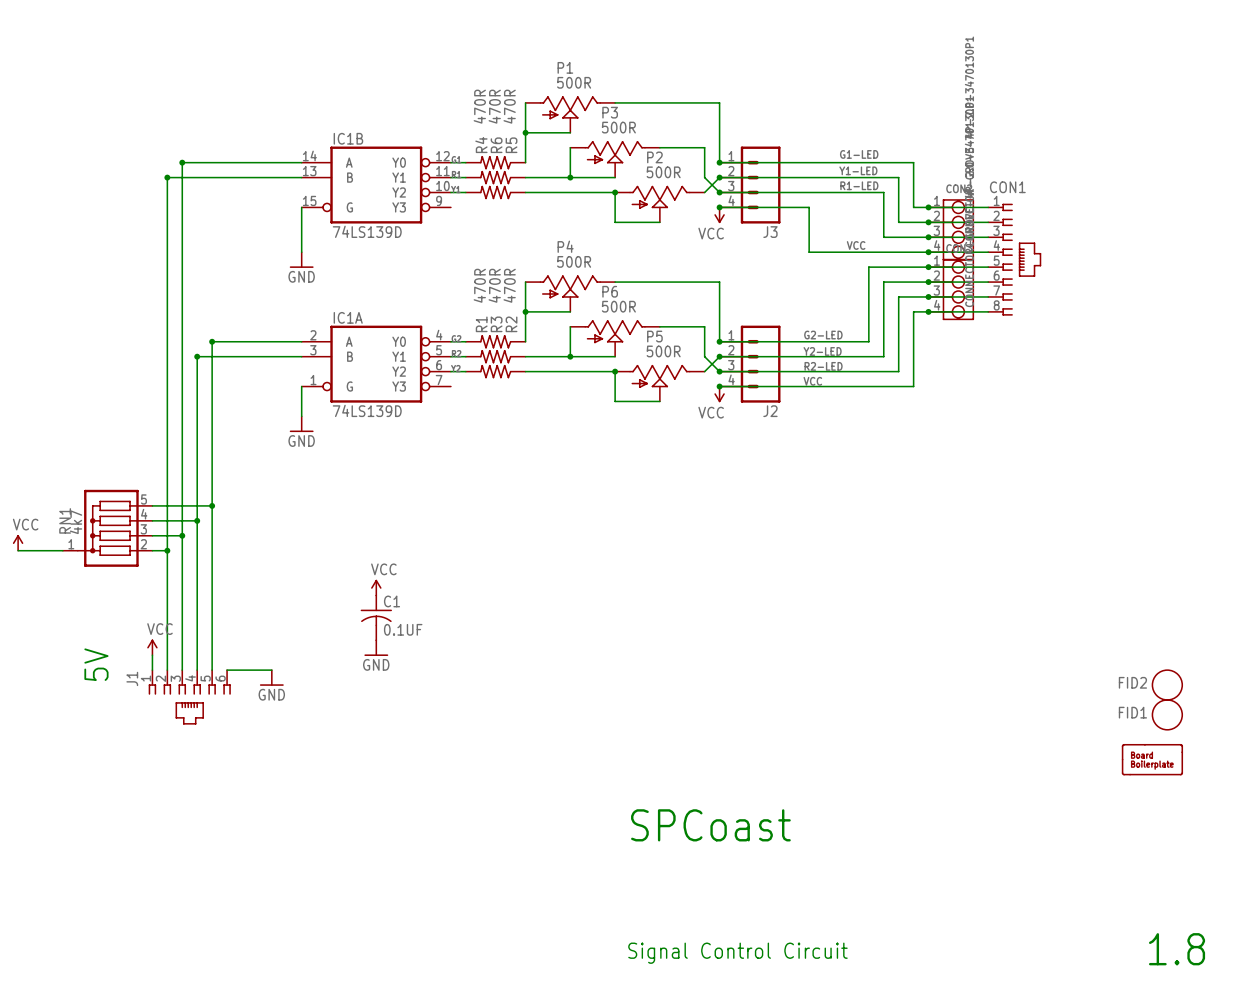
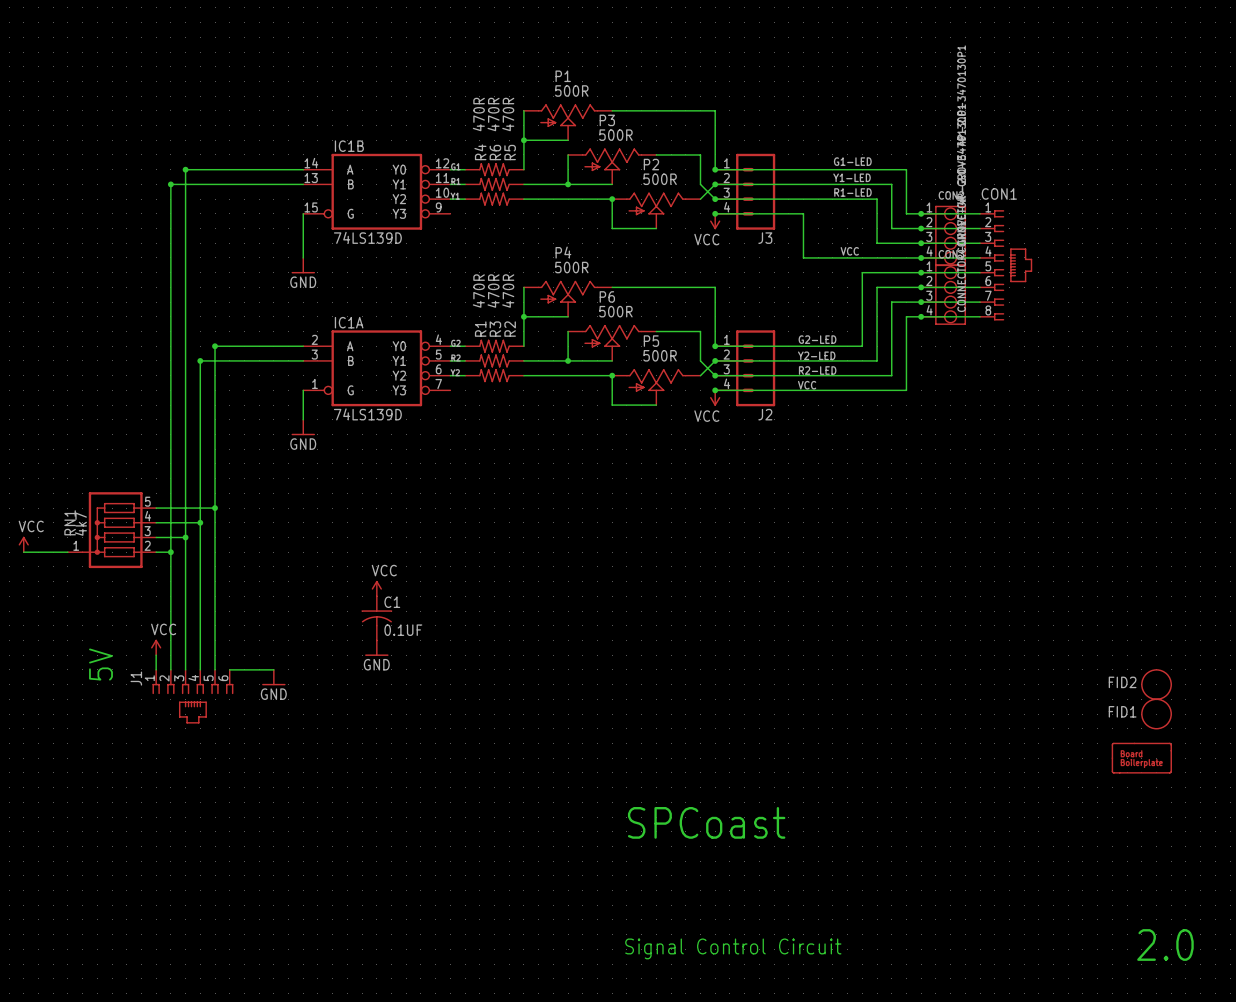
text: 1.8 (1177, 949) -> 2.0 (1165, 944)

